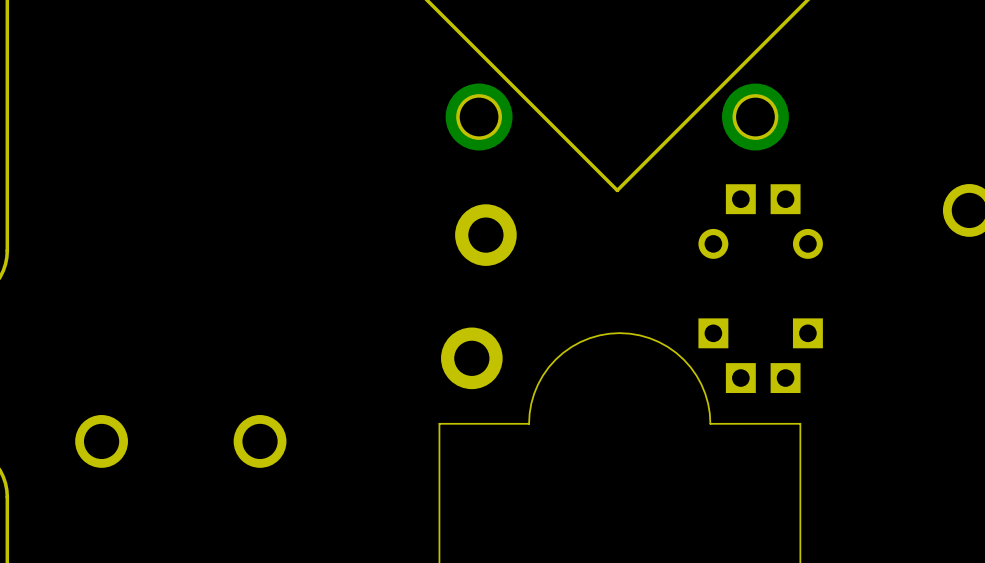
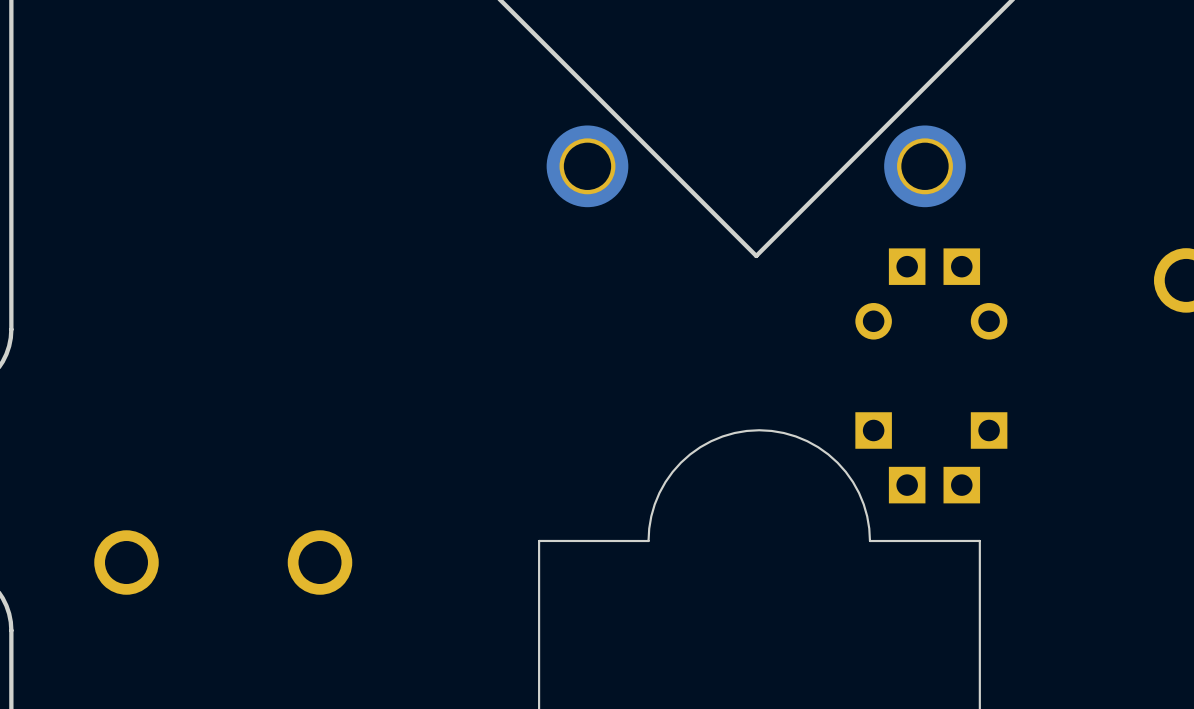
part: (485, 235) -> none
part: (471, 358) -> none

